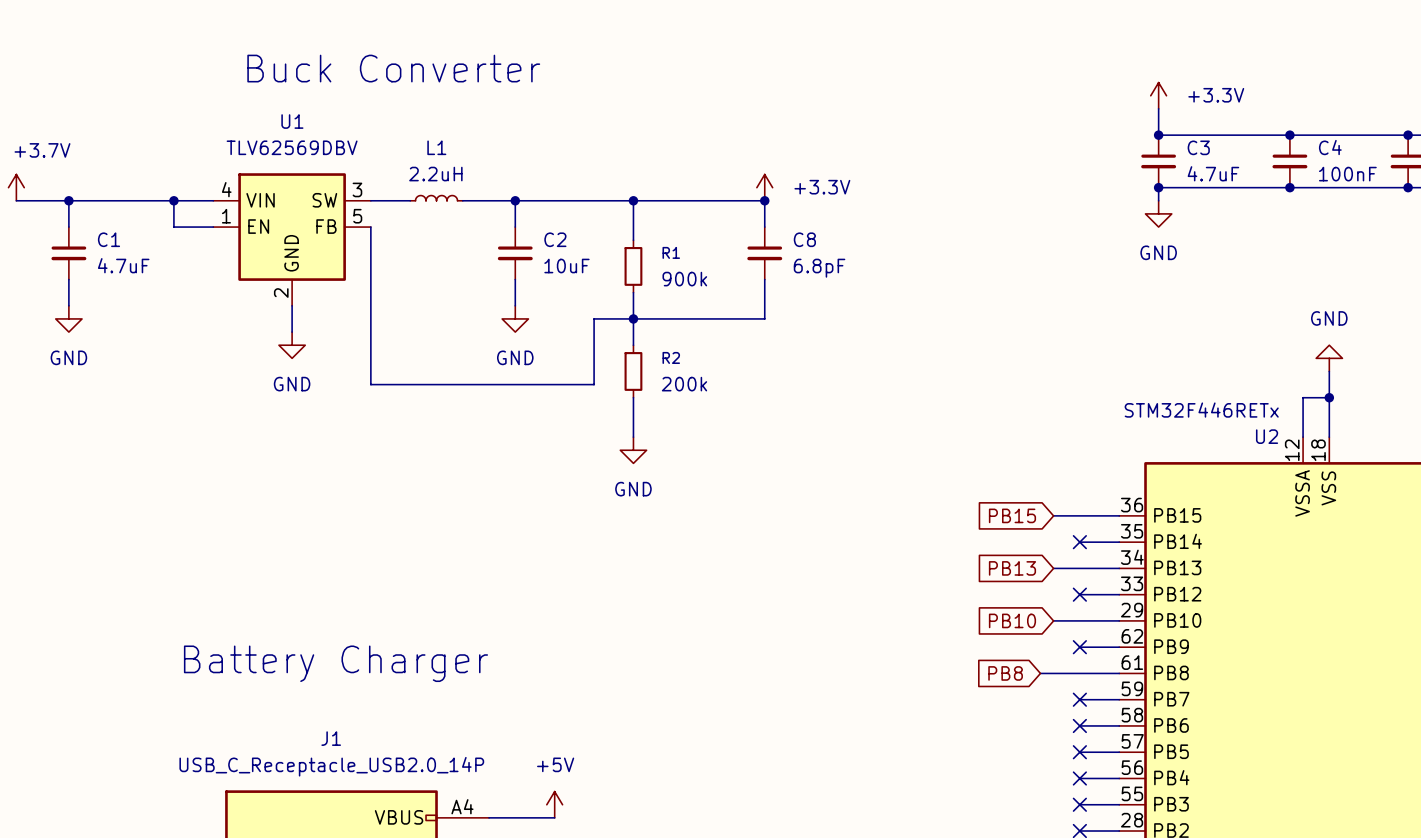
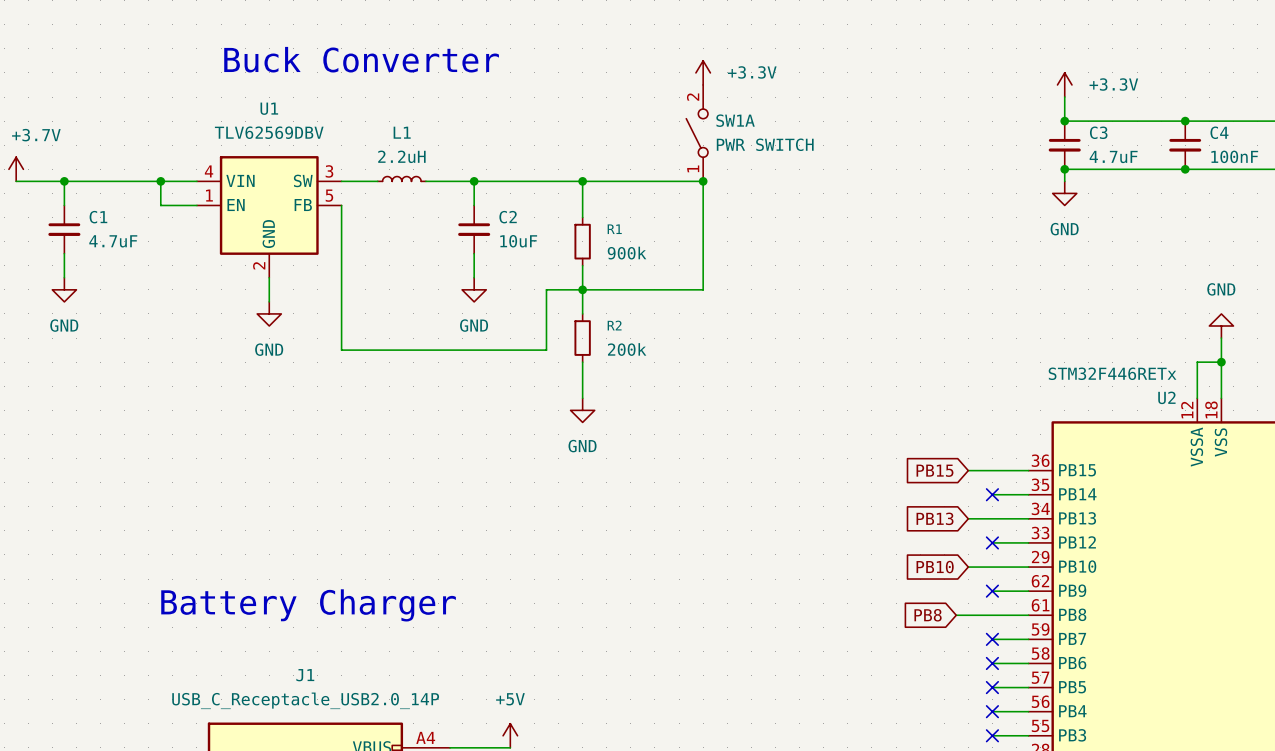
SW1A: none -> PWR SWITCH (697, 133)
power symbol position: +3.3V (764, 187) -> +3.3V (703, 72)
C8: 6.8pF (764, 253) -> none

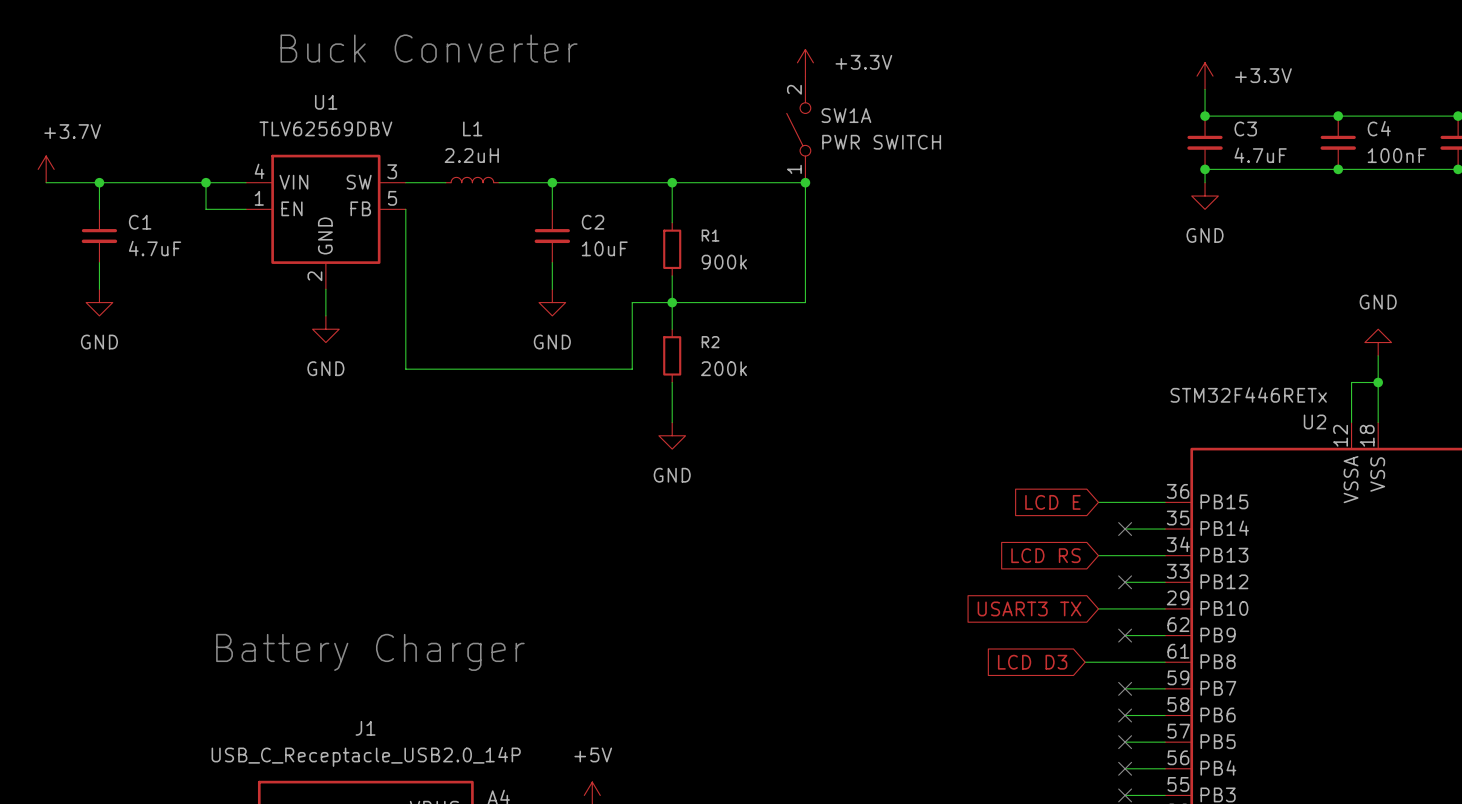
global label: PB15 (934, 470) -> LCD E (1052, 502)
global label: PB13 (935, 518) -> LCD RS (1045, 555)
global label: PB10 (935, 567) -> USART3 TX (1029, 608)
global label: PB8 (928, 615) -> LCD D3 (1032, 662)

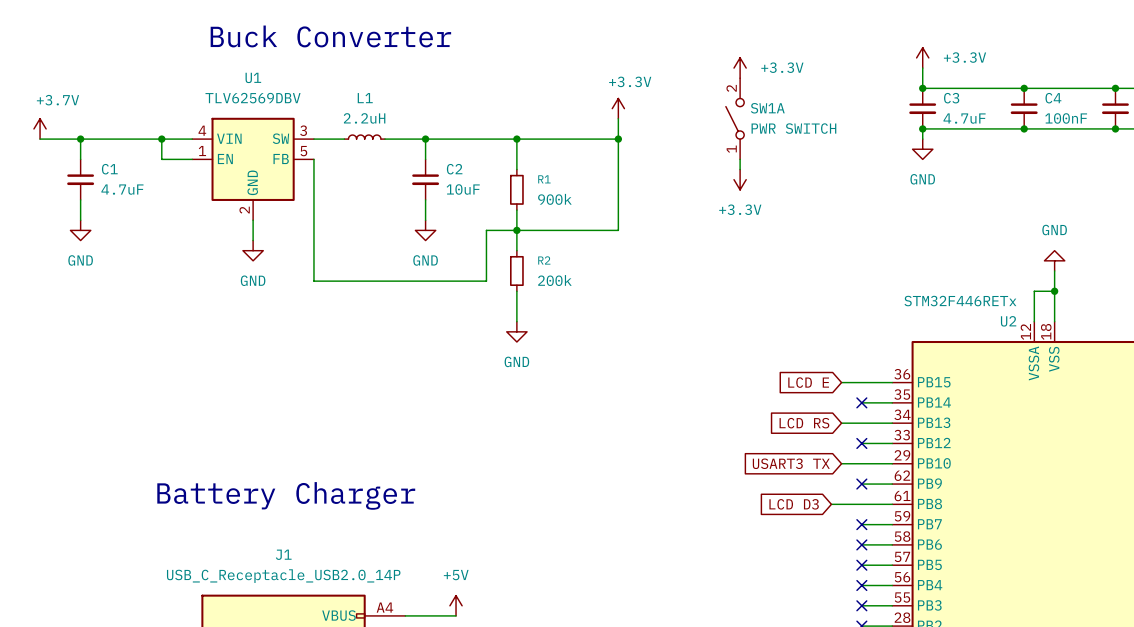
power symbol position: +3.3V (805, 62) -> +3.3V (618, 108)
power symbol text position: +3.3V (863, 62) -> +3.3V (630, 81)
power symbol: none -> +3.3V (740, 68)
SW1A position: (798, 129) -> (735, 118)
wire: none -> (740, 159) (740, 169)
power symbol: none -> +3.3V (740, 179)

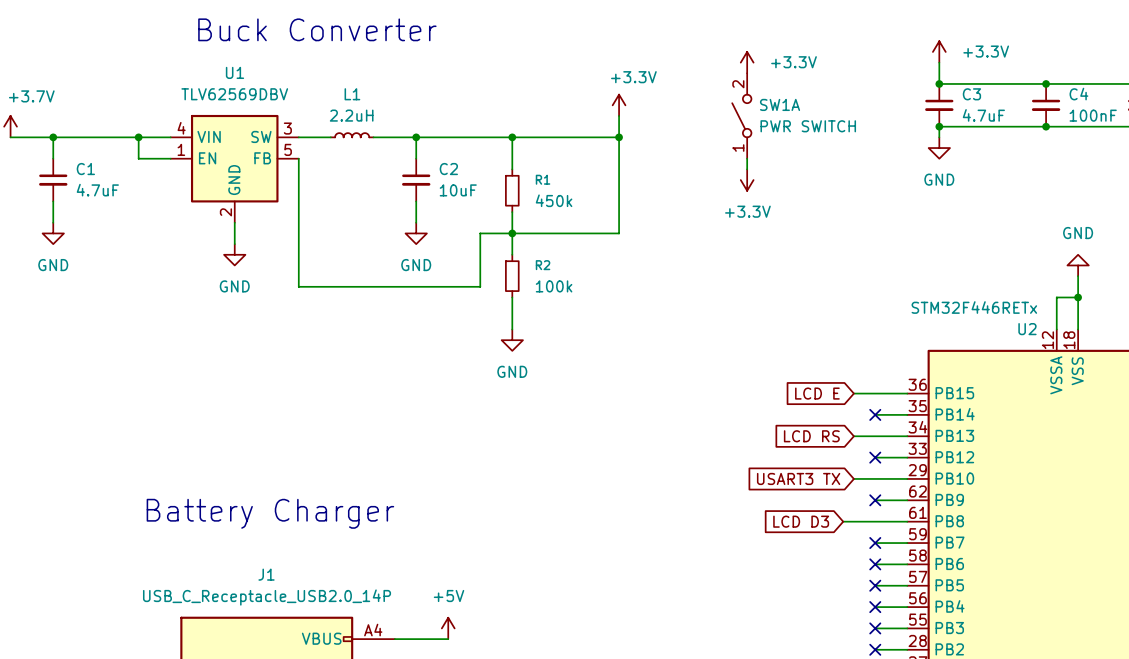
R1 value: 900k (554, 199) -> 450k (554, 200)
R2 value: 200k (554, 280) -> 100k (554, 286)

